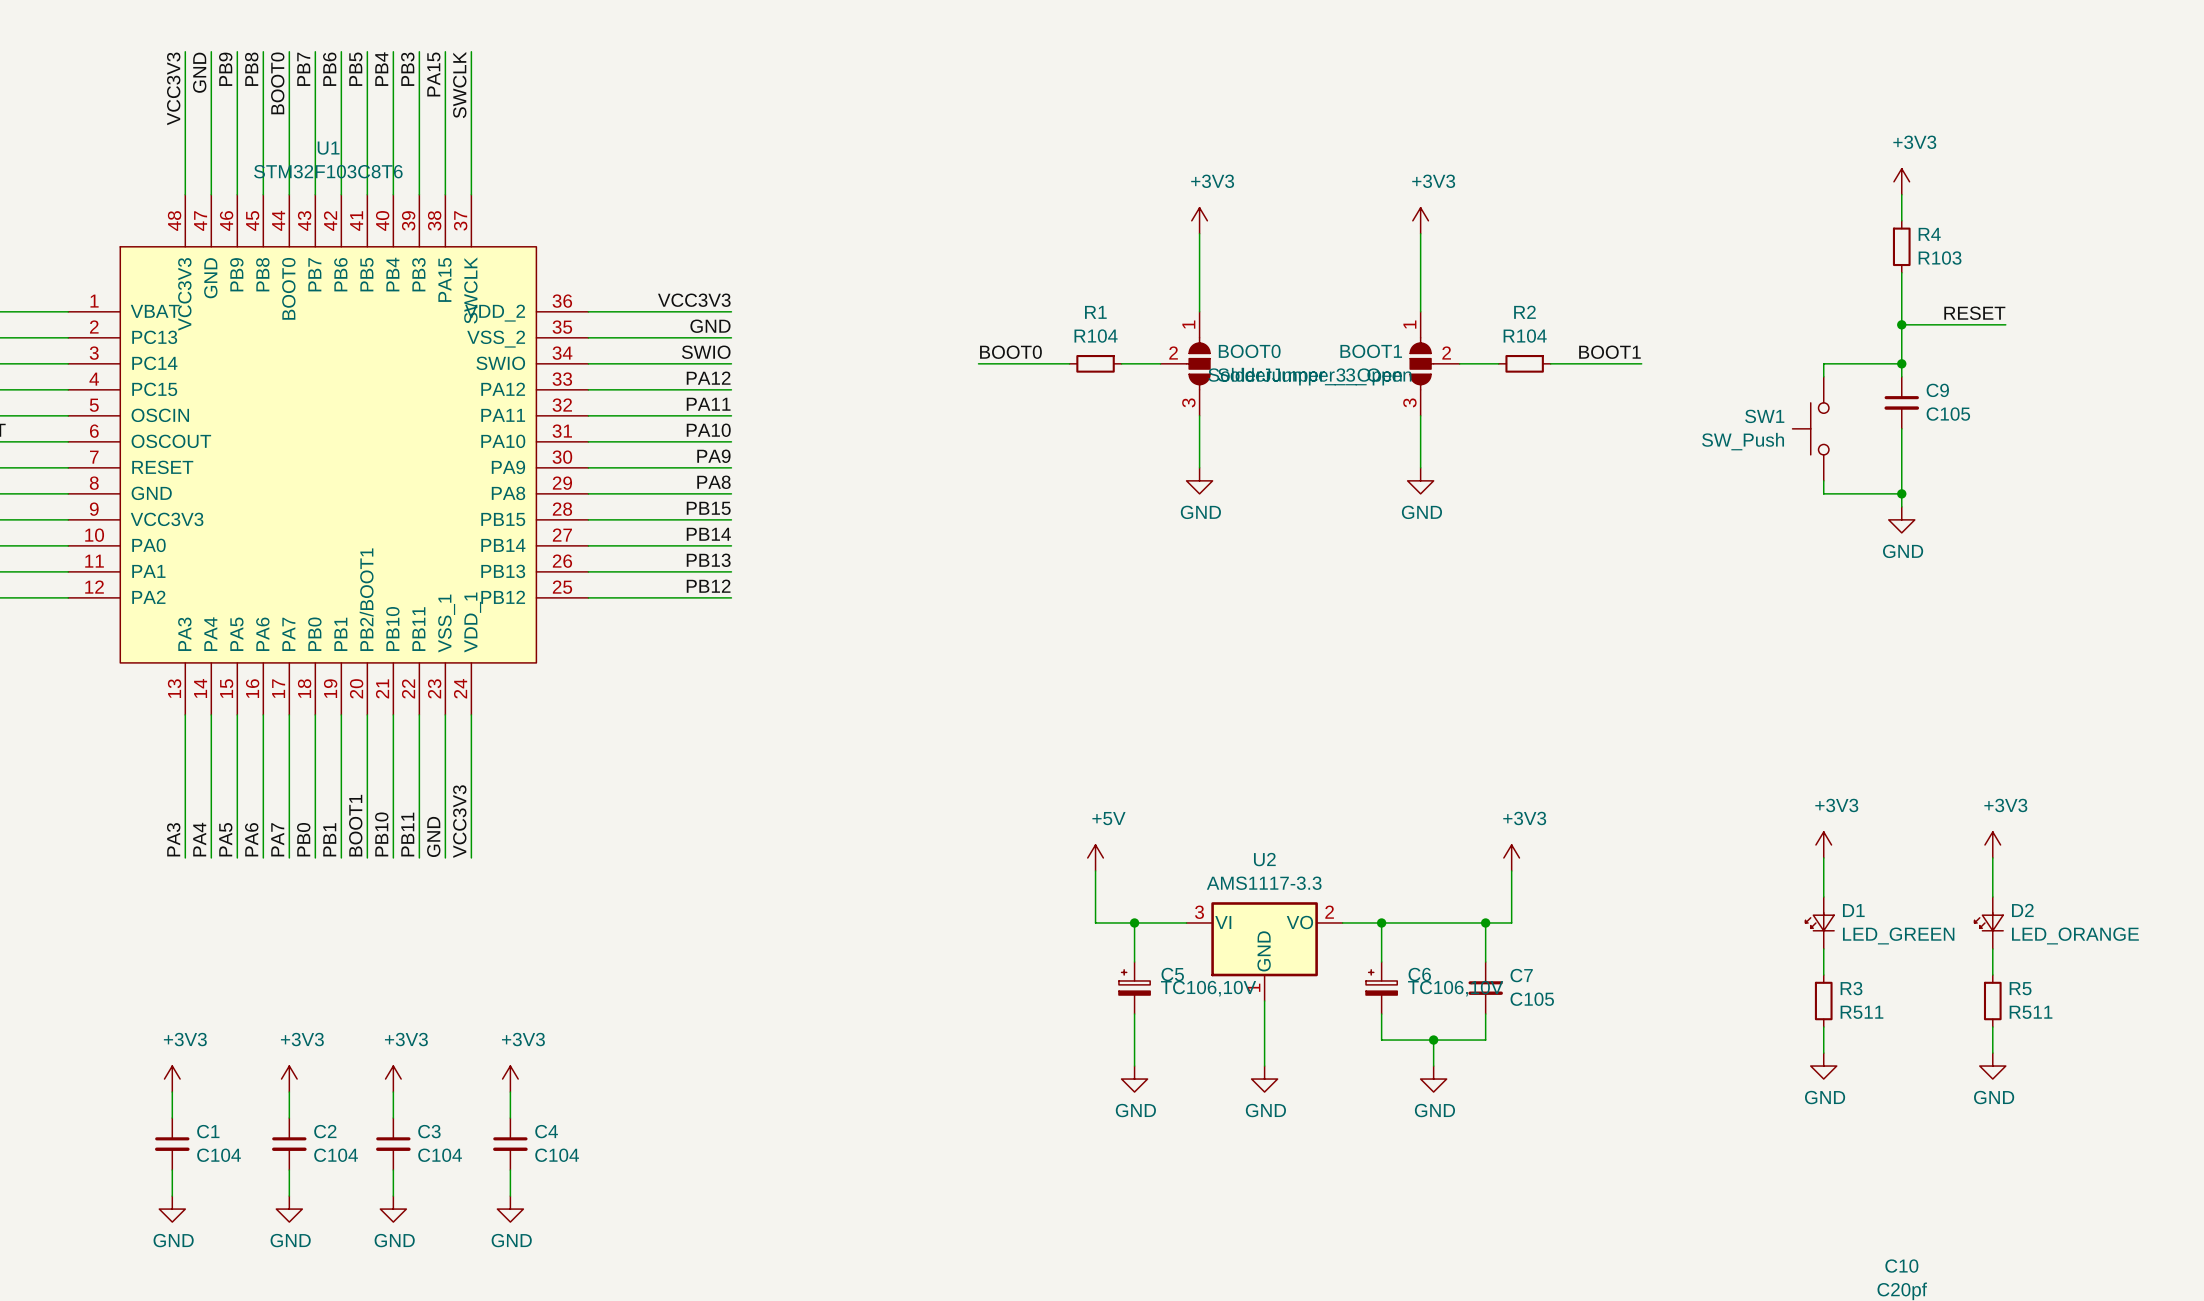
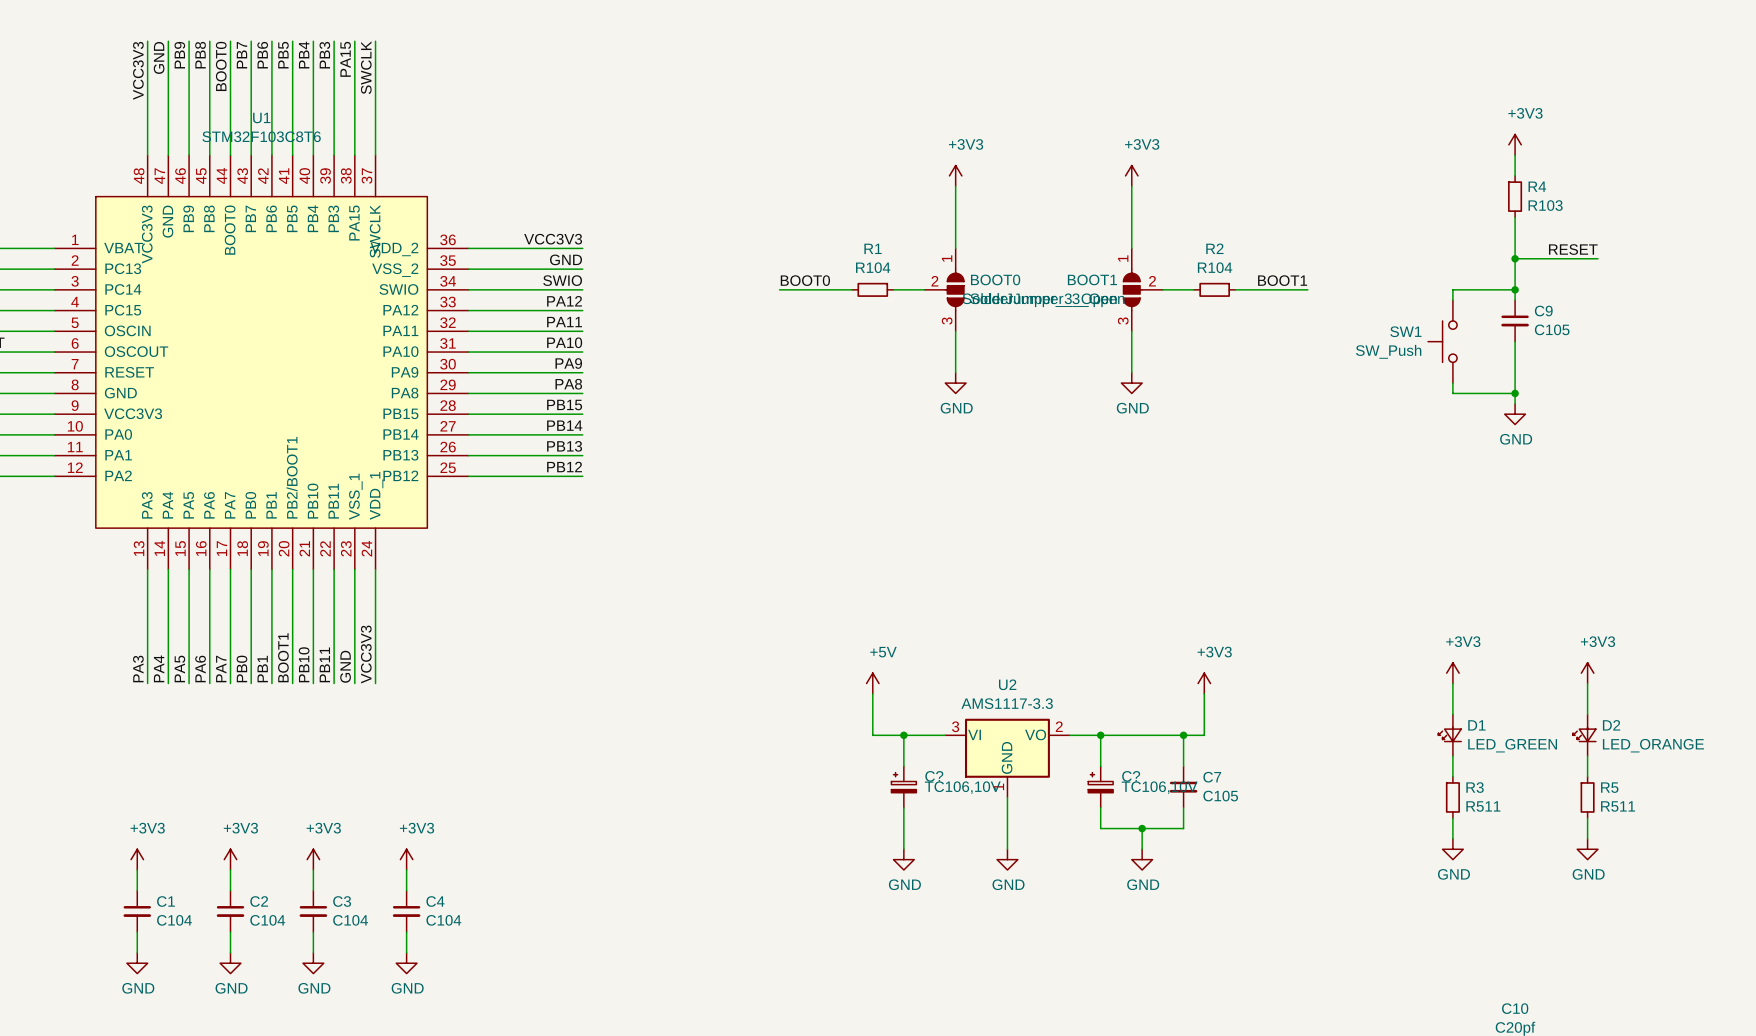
C5 name: C5 (1172, 974) -> C? (934, 776)
C6 name: C6 (1419, 974) -> C? (1131, 776)

